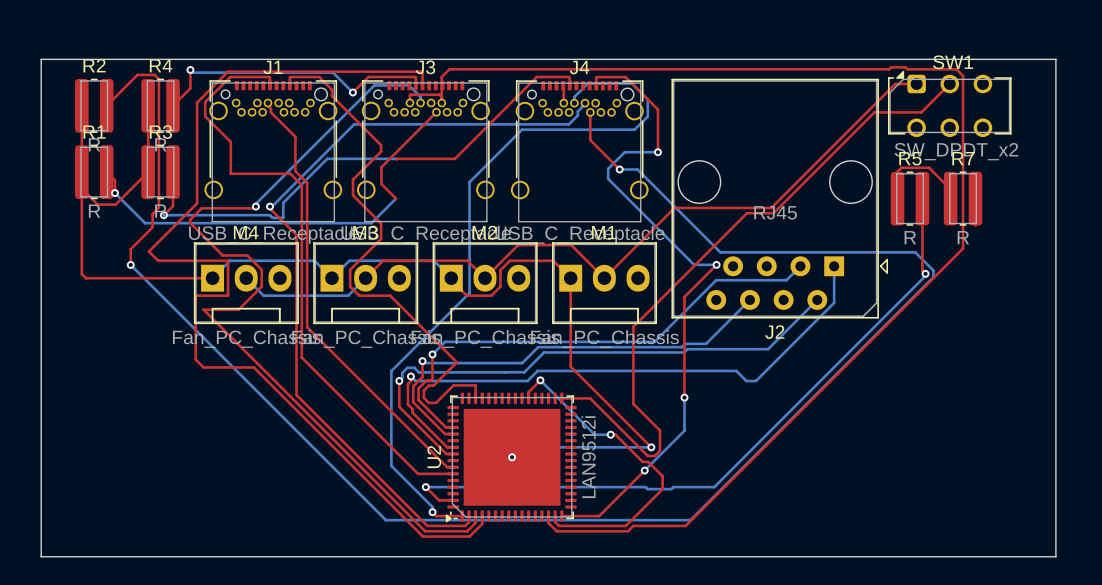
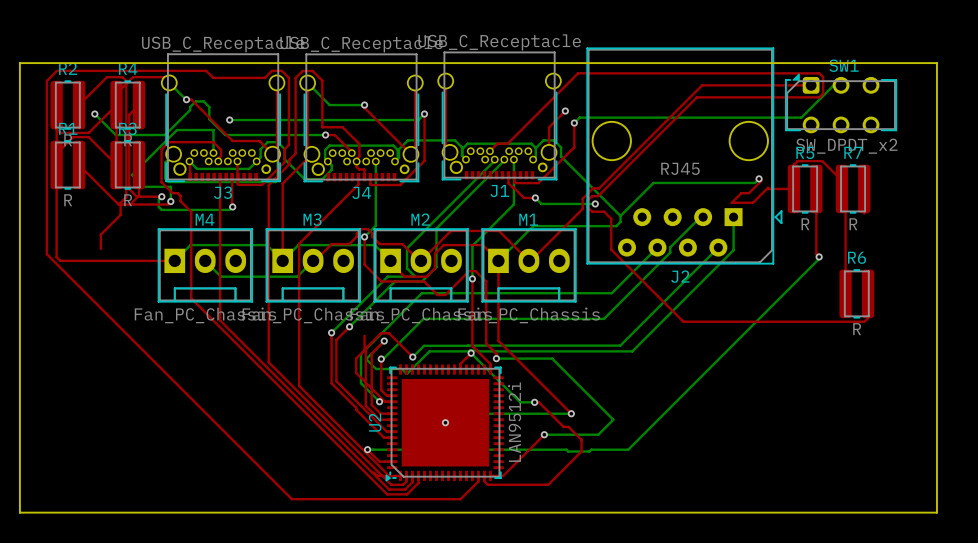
top track: (190, 69) (190, 88) (173, 105) -> (161, 196) (136, 196) (129, 189) (129, 114) (139, 105)
bottom track: (190, 69) (190, 72) (333, 72) (352, 92) -> none
via: (190, 69) -> none
top track: none -> (445, 81) (445, 148) (450, 152)
top track: none -> (169, 82) (163, 77) (133, 77) (116, 93) (116, 105) (88, 132) (60, 132) (56, 129)
bottom track: none -> (169, 82) (186, 99)
top track: none -> (276, 82) (276, 149) (272, 154) (259, 141) (232, 141) (191, 99) (186, 99)
top track: none -> (307, 82) (307, 150) (311, 154) (282, 183) (282, 260)
bottom track: none -> (307, 82) (329, 105) (364, 105)
top track: none -> (415, 82) (415, 150) (410, 154) (364, 107) (364, 105)
top track: (895, 84) (771, 207) (674, 207) (604, 278) -> (791, 85) (702, 85) (599, 188) (593, 188) (582, 198) (582, 208) (528, 260)
top track: (949, 84) (921, 112) (874, 112) (773, 213) (747, 213) (633, 326) (633, 403) (659, 430) (659, 450) (654, 455) (647, 455) (590, 398) (561, 398) -> (472, 278) (472, 346) (490, 364) (490, 369)
bottom track: none -> (841, 85) (833, 85) (801, 117) (579, 117) (574, 123)
top track: (270, 85) (269, 76) (230, 76) (205, 102) (205, 116) (230, 141) (230, 173) (290, 173) (301, 185) (301, 357) (418, 473) (444, 473) -> (331, 332) (331, 383) (384, 437)
top track: (289, 85) (290, 76) (319, 76) (332, 89) (332, 96) (381, 145) (381, 151) (353, 179) (353, 195) (381, 223) (381, 238) (350, 269) -> (358, 177) (358, 184) (299, 243) (299, 253)
top track: (415, 85) (415, 76) (368, 76) (352, 92) -> none
top track: (422, 85) (421, 71) (228, 71) (197, 102) (197, 203) (148, 251) (158, 260) (228, 260) (228, 295) (195, 297) (195, 359) (203, 367) (253, 367) (422, 536) (447, 536) -> (218, 161) (221, 149) (213, 142) (168, 142) (161, 149) (161, 182) (172, 193) (177, 193) (180, 195) (180, 201) (191, 211) (191, 298) (387, 494)
top track: (563, 85) (563, 103) -> none
top track: (569, 85) (568, 76) (536, 76) (454, 158) (396, 159) -> none
top track: (596, 85) (596, 77) (625, 77) (657, 109) (657, 152) -> none
via: (352, 92) -> none
top track: (441, 96) (439, 94) (410, 94) (409, 103) -> none
via: none -> (186, 99)
top track: (268, 103) (271, 112) (295, 136) (295, 171) (307, 182) (307, 327) (391, 411) -> (349, 326) (336, 340) (336, 381)
bottom track: (420, 103) (420, 96) (409, 85) (374, 85) (255, 203) (255, 206) -> none
top track: (441, 103) (441, 77) (449, 69) (889, 69) (891, 67) (905, 67) (907, 69) (956, 69) (963, 75) (963, 248) (685, 525) (633, 525) (627, 531) (556, 531) (548, 522) -> (237, 161) (238, 184) (262, 184) (284, 162) (284, 149) (288, 144) (288, 77) (281, 70) (271, 70) (264, 77) (213, 77) (206, 70) (56, 70) (46, 80) (46, 254) (291, 499) (460, 499) (478, 481)
bottom track: (574, 103) (574, 97) (587, 83) (632, 83) (647, 99) (647, 116) (634, 129) (522, 129) (469, 182) (469, 264) -> (494, 159) (407, 248)
bottom track: (585, 103) (577, 111) (577, 115) (568, 124) (354, 124) (270, 206) -> none
via: none -> (364, 105)
top track: (436, 112) (381, 167) (381, 184) (396, 198) -> none
top track: (590, 112) (590, 140) (619, 169) -> none
top track: none -> (565, 111) (549, 127) (549, 152)
via: none -> (565, 111)
bottom track: none -> (94, 114) (115, 135) (165, 135) (190, 110) (190, 107) (195, 101) (203, 101) (209, 107) (209, 119) (225, 135) (325, 135)
via: none -> (94, 114)
top track: none -> (424, 114) (424, 160) (400, 185) (371, 185) (370, 177)
bottom track: none -> (424, 114) (418, 120) (229, 120)
via: none -> (424, 114)
via: none -> (229, 120)
top track: none -> (574, 123) (574, 147) (538, 183) (515, 183) (514, 175)
via: none -> (574, 123)
top track: none -> (325, 135) (334, 135) (351, 153)
via: none -> (325, 135)
J1 rotation: 0° (273, 151) -> 180° (499, 116)
J1 position: (273, 151) -> (499, 116)
J3 rotation: 0° (425, 151) -> 180° (223, 117)
J3 position: (425, 151) -> (223, 117)
J4 rotation: 0° (579, 151) -> 180° (361, 117)
J4 position: (579, 151) -> (361, 117)
bottom track: (657, 152) (624, 152) (608, 168) (608, 178) (694, 264) (716, 264) -> none
via: (657, 152) -> none
bottom track: none -> (535, 148) (535, 156) (533, 159)
bottom track: none -> (535, 148) (531, 143) (467, 143) (462, 148) (462, 156)
bottom track: none -> (535, 148) (543, 140) (554, 140) (561, 147) (561, 156) (620, 215)
top track: none -> (489, 151) (497, 143) (507, 143) (578, 73) (819, 73) (823, 77) (823, 93) (819, 97) (696, 97) (598, 196) (592, 196) (587, 200) (587, 207) (592, 211) (604, 211) (611, 218) (611, 249) (683, 321) (864, 321) (868, 318) (868, 293)
bottom track: none -> (213, 153) (213, 130) (176, 130) (131, 174) (143, 186) (170, 186) (170, 201)
bottom track: (396, 158) (327, 158) (283, 202) (283, 217) (272, 217) (270, 215) (163, 215) -> none
bottom track: none -> (173, 154) (165, 162) (165, 178) (168, 182) (275, 182) (277, 179) (277, 159) (272, 154)
bottom track: none -> (397, 158) (397, 150) (393, 145) (329, 145) (325, 150) (325, 158) (331, 165) (331, 169) (322, 179) (304, 179) (284, 159) (284, 149) (277, 142) (267, 142) (260, 149) (260, 157) (249, 168) (197, 168) (189, 161)
bottom track: none -> (465, 159) (462, 155) (462, 147) (455, 140) (407, 140) (398, 149) (398, 157) (395, 161)
bottom track: none -> (504, 159) (436, 228) (436, 266) (422, 281) (394, 281) (349, 326)
bottom track: none -> (513, 159) (513, 204) (472, 245) (472, 278)
top track: none -> (189, 161) (190, 177)
bottom track: none -> (375, 161) (375, 225) (364, 236)
bottom track: (619, 169) (637, 169) (720, 252) (915, 252) (933, 270) (933, 277) (690, 520) (385, 520) (130, 264) -> none
via: (619, 169) -> none
top track: (148, 172) (115, 204) (97, 204) (81, 188) -> (116, 164) (88, 137) (73, 137) (56, 153)
top track: (114, 180) (114, 193) -> (86, 172) (118, 204) (167, 204) (170, 201)
top track: none -> (508, 175) (508, 183) (523, 197) (535, 197)
top track: none -> (232, 177) (232, 206)
top track: none -> (759, 178) (761, 181) (749, 193) (741, 193) (731, 202) (753, 202) (767, 187) (793, 188)
bottom track: none -> (759, 178) (755, 182) (653, 182) (620, 215)
via: none -> (759, 178)
bottom track: (114, 193) (145, 223) (371, 223) (396, 198) -> none
via: (114, 193) -> none
J2 position: (779, 198) -> (684, 156)
top track: none -> (841, 188) (845, 192) (845, 293)
top track: (255, 206) (254, 208) (201, 208) (190, 219) (190, 222) (222, 255) (247, 255) (261, 269) (261, 286) (238, 309) (203, 309) (425, 531) (449, 531) -> (220, 177) (220, 320) (389, 489)
via: (255, 206) -> none
top track: (270, 206) (296, 235) (296, 395) (427, 525) (465, 525) -> (364, 177) (364, 170) (356, 167) (359, 144) (342, 127) (322, 127) (322, 80) (312, 70) (302, 70) (295, 78) (295, 153) (289, 159) (289, 164) (268, 184) (268, 362) (391, 484) (403, 484)
via: (270, 206) -> none
bottom track: none -> (161, 196) (158, 199) (158, 207) (161, 209) (229, 209) (232, 206)
via: none -> (161, 196)
bottom track: none -> (535, 197) (541, 203) (595, 203)
via: none -> (535, 197)
via: none -> (170, 201)
via: (163, 215) -> none
via: none -> (595, 203)
via: none -> (232, 206)
bottom track: none -> (620, 215) (620, 221) (616, 226) (533, 226) (498, 260)
bottom track: none -> (703, 217) (700, 217) (670, 247) (670, 252) (603, 318) (423, 318) (381, 359)
bottom track: none -> (733, 217) (733, 250) (632, 351) (429, 351) (406, 373) (401, 369) (376, 369) (366, 359) (384, 341)
top track: none -> (364, 236) (364, 264) (381, 281) (424, 281) (437, 295) (445, 295) (469, 271) (475, 271) (486, 281) (486, 343) (496, 353) (496, 358)
via: none -> (364, 236)
bottom track: none -> (657, 247) (611, 293) (421, 293) (360, 354) (360, 383) (379, 401)
bottom track: none -> (718, 247) (620, 345) (424, 345) (412, 357)
via: (130, 264) -> none
top track: (716, 264) (684, 296) (684, 397) -> none
via: (716, 264) -> none
bottom track: (800, 266) (786, 280) (716, 280) (654, 341) (445, 341) (432, 354) -> none
bottom track: (834, 266) (834, 302) (755, 381) (746, 381) (736, 370) (537, 370) (527, 381) (415, 381) (410, 376) -> none
top track: (365, 278) (383, 260) (467, 260) (485, 278) -> (313, 260) (331, 244) (349, 244) (361, 229) (367, 229) (379, 244) (402, 244) (421, 260)
top track: (350, 286) (359, 295) (390, 295) (456, 362) (433, 385) (428, 385) (423, 390) -> (299, 268) (299, 385) (389, 475)
bottom track: (469, 286) (469, 292) (391, 371) (391, 465) (432, 507) (432, 512) -> (407, 268) (415, 276) (387, 276) (331, 332)
via: none -> (472, 278)
bottom track: (749, 299) (706, 343) (685, 343) (682, 347) (538, 347) (522, 363) (424, 363) (422, 361) -> none
bottom track: (817, 299) (768, 349) (687, 349) (684, 352) (544, 352) (524, 372) (505, 372) -> none
R6: none -> R (856, 293)
via: none -> (349, 326)
top track: (432, 354) (432, 379) (426, 380) (418, 388) (418, 400) (447, 427) -> (381, 359) (381, 390) (386, 395)
via: (432, 354) -> none
via: none -> (331, 332)
via: (422, 361) -> none
via: none -> (384, 341)
bottom track: (505, 372) (419, 372) (414, 367) (407, 367) (402, 372) (402, 378) (399, 381) -> none
top track: (410, 376) (412, 379) (407, 384) (407, 404) (412, 409) (412, 412) (447, 447) -> (384, 341) (371, 353) (371, 404) (380, 413) (386, 413)
via: (410, 376) -> none
top track: (399, 381) (399, 406) (446, 453) -> (365, 369) (365, 405) (379, 419) (386, 419)
via: (399, 381) -> none
top track: none -> (412, 357) (388, 333) (381, 333) (365, 348) (365, 362)
via: none -> (412, 357)
via: none -> (381, 359)
bottom track: none -> (496, 358) (552, 358) (613, 419) (598, 434) (544, 434)
via: none -> (496, 358)
top track: (423, 397) (428, 402) (436, 402) (453, 385) (475, 385) (475, 398) -> none
bottom track: (684, 397) (684, 430) (644, 470) -> none
via: (684, 397) -> none
via: none -> (379, 401)
top track: (644, 470) (599, 516) (575, 516) -> (544, 434) (503, 475)
via position: (644, 470) -> (544, 434)
via: (432, 512) -> none

